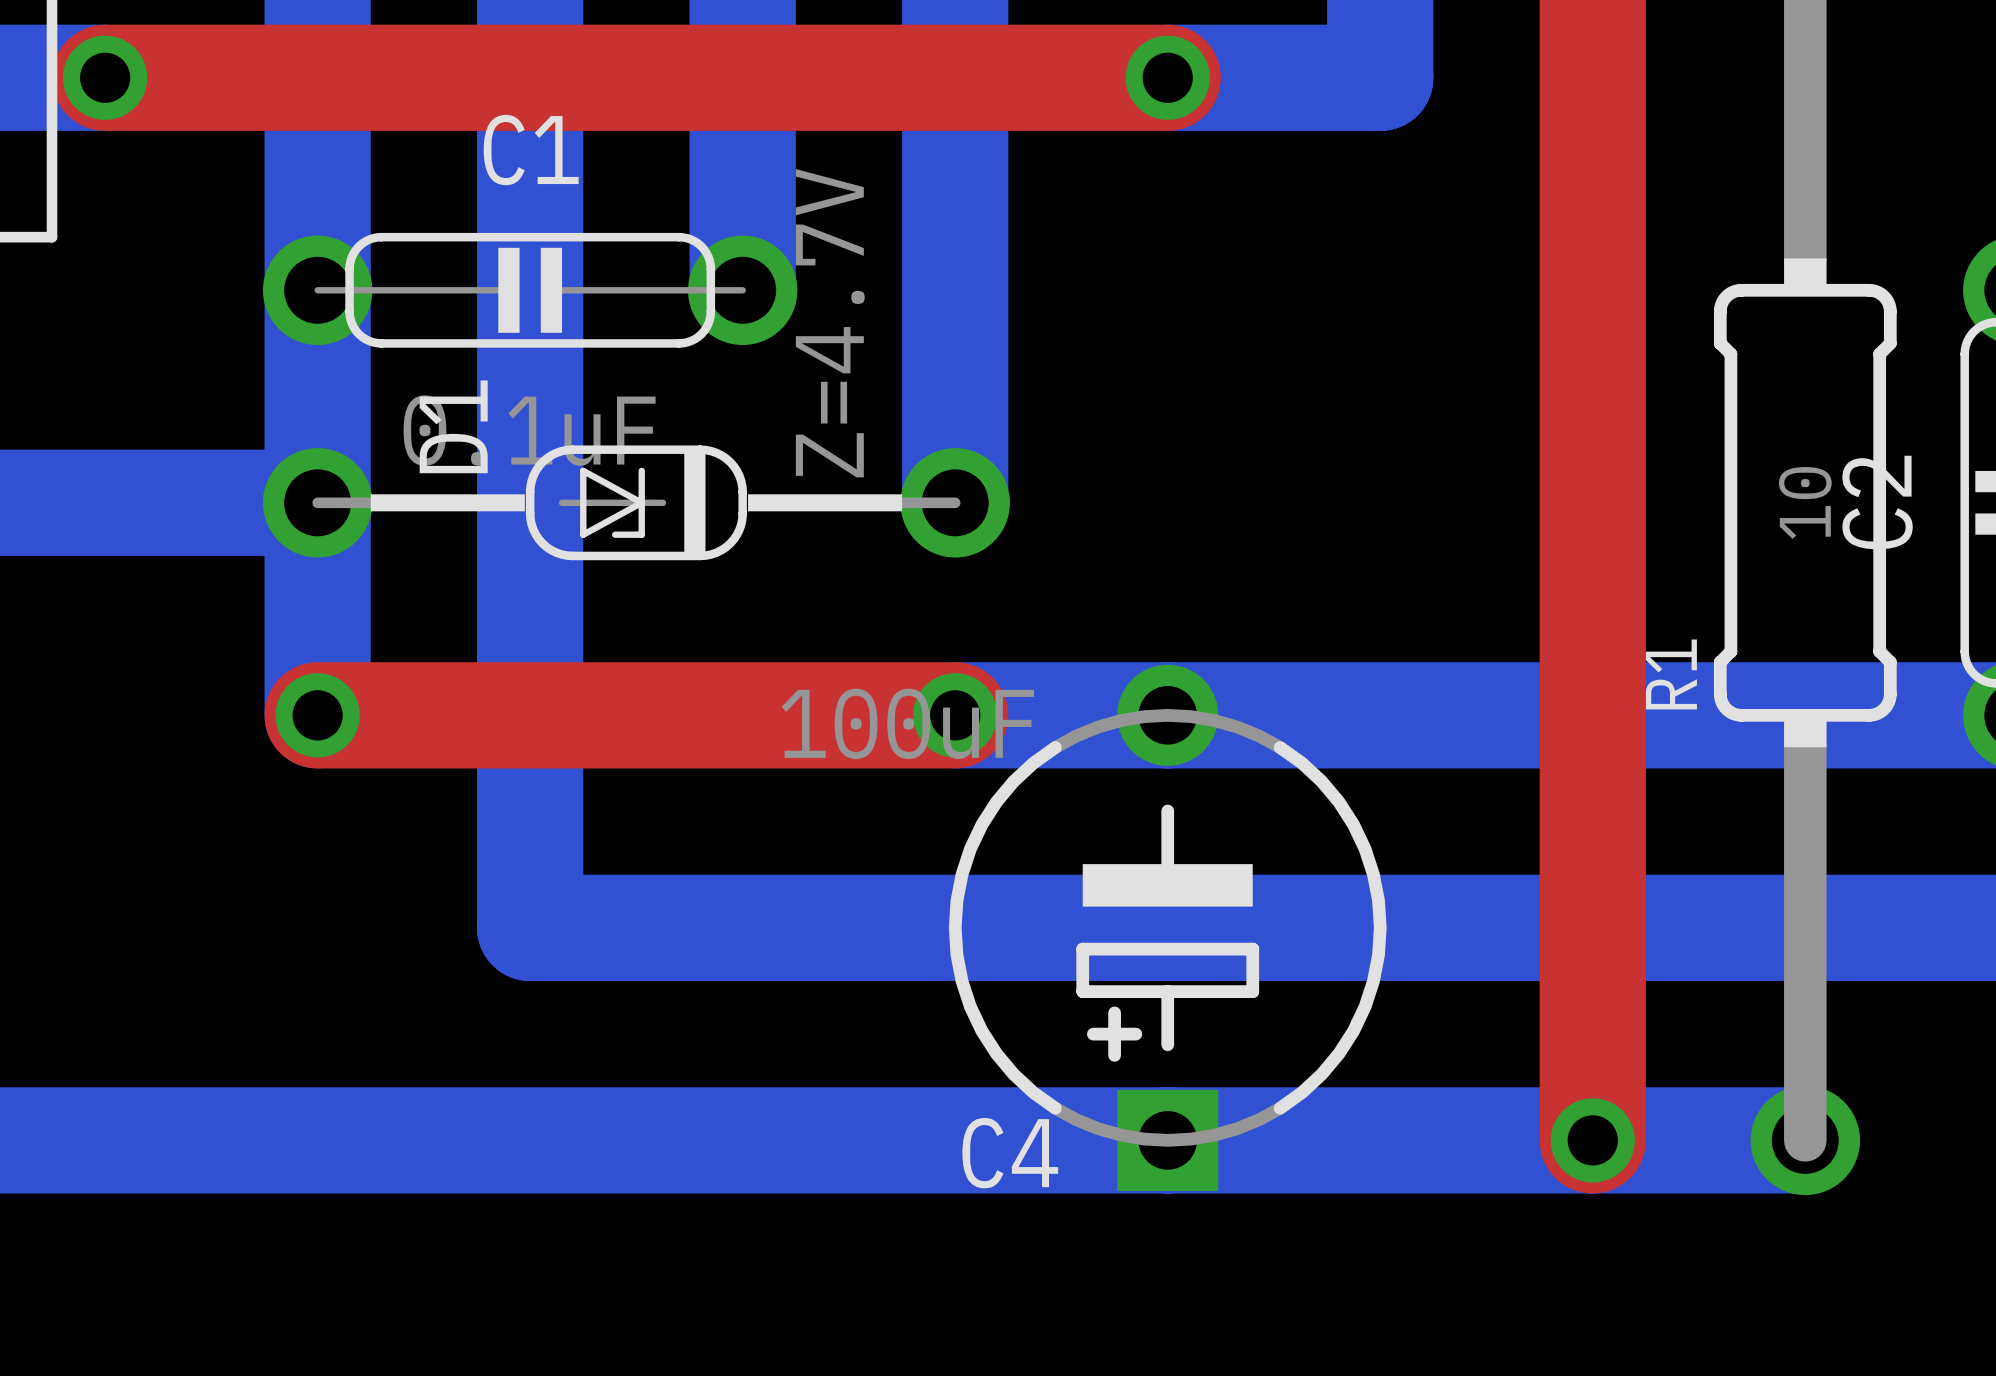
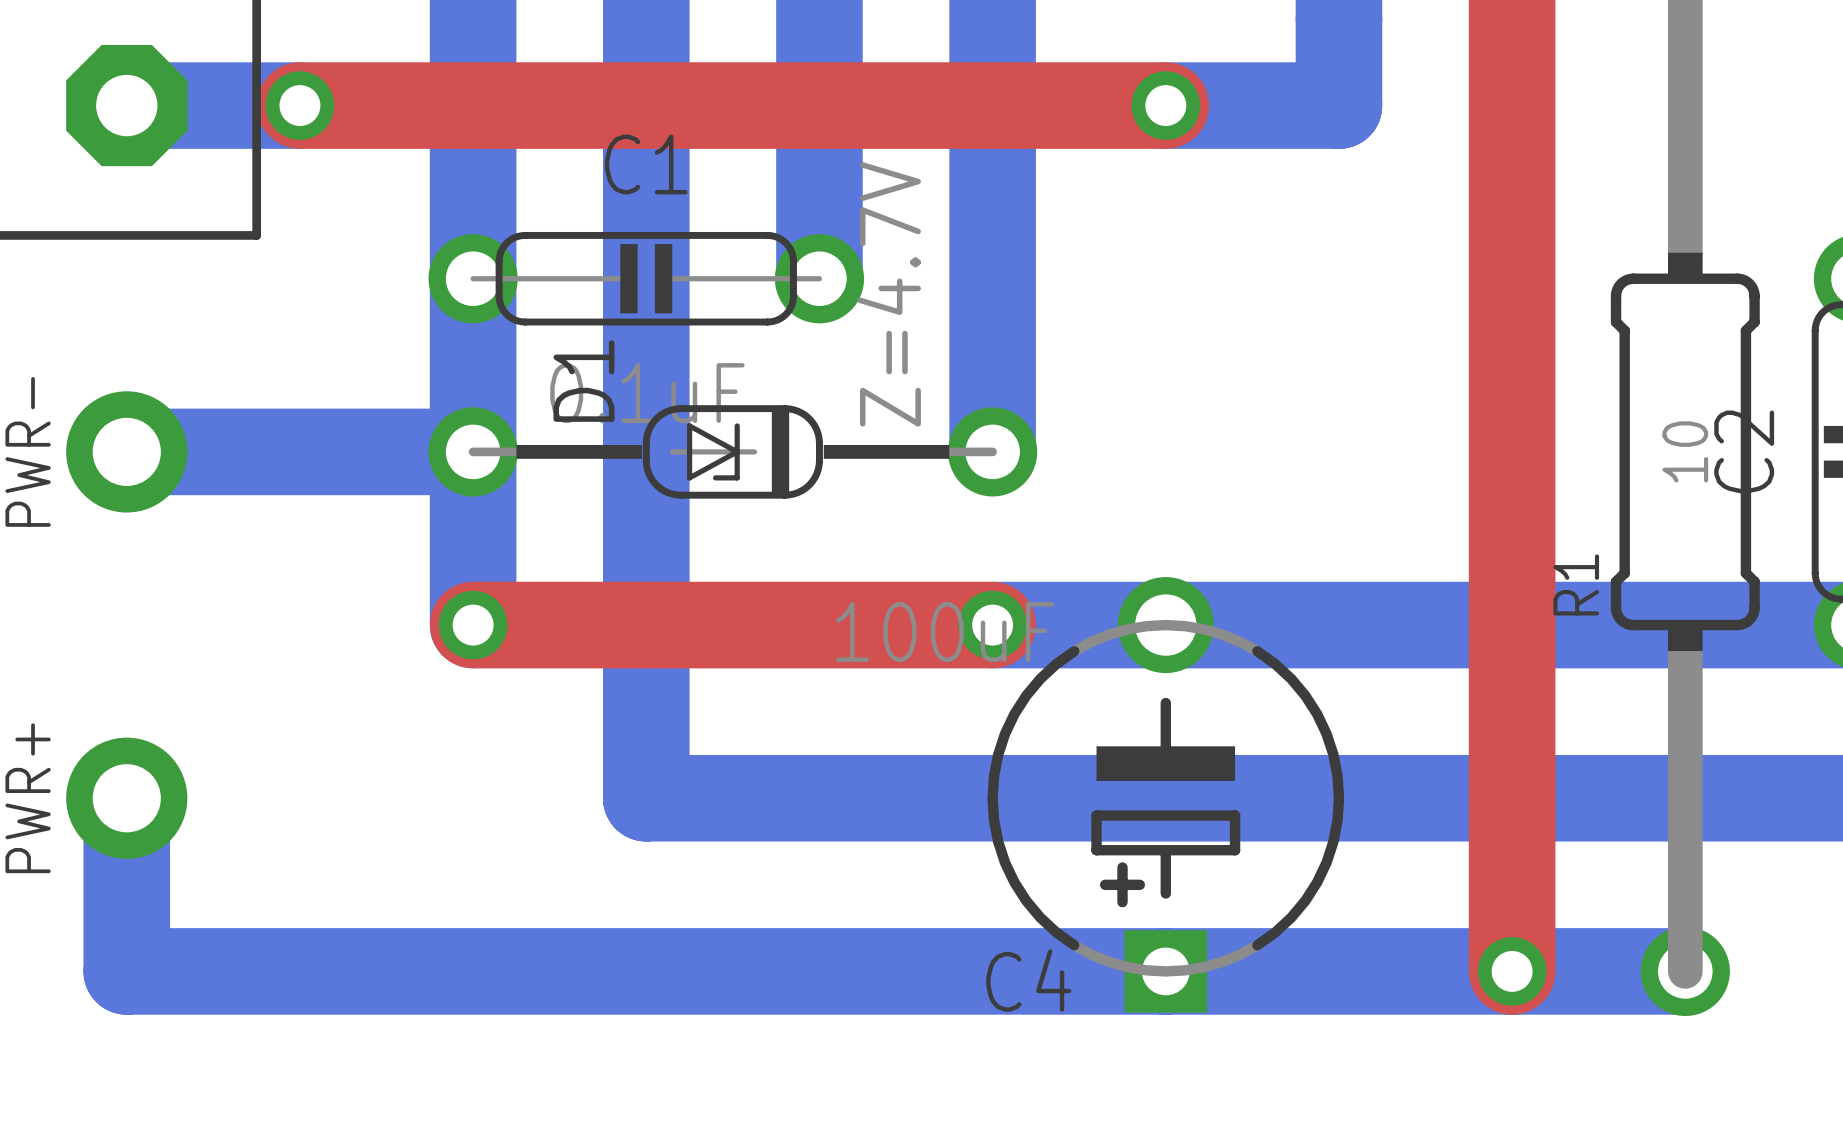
C4 footprint: [948, 664, 1387, 1191] -> [987, 577, 1345, 1013]

